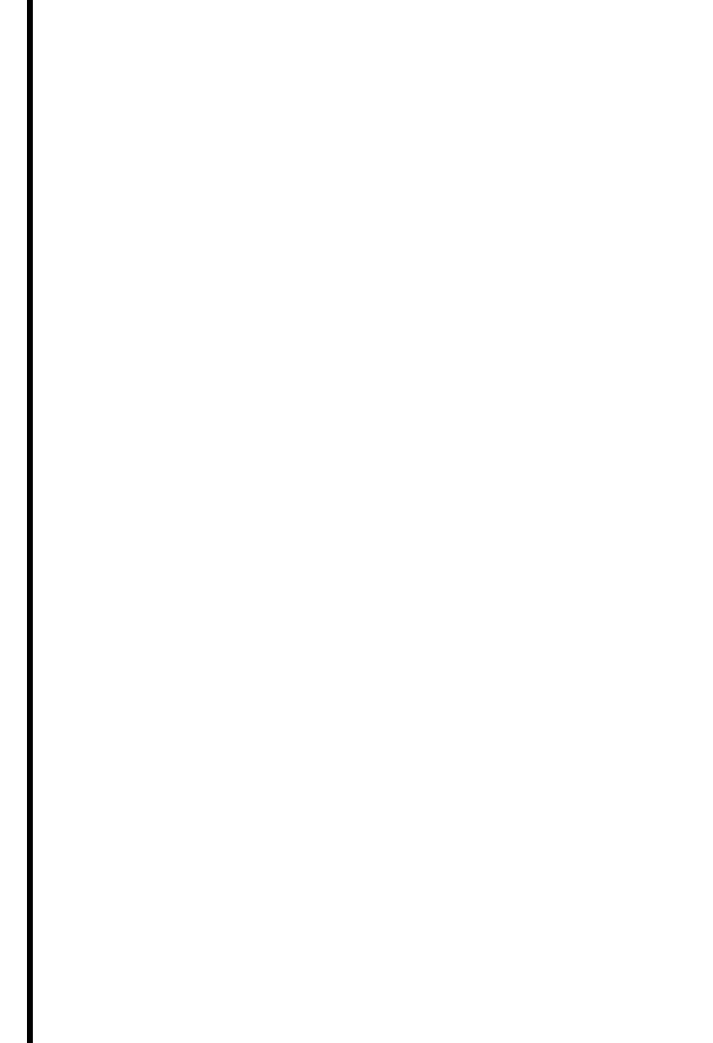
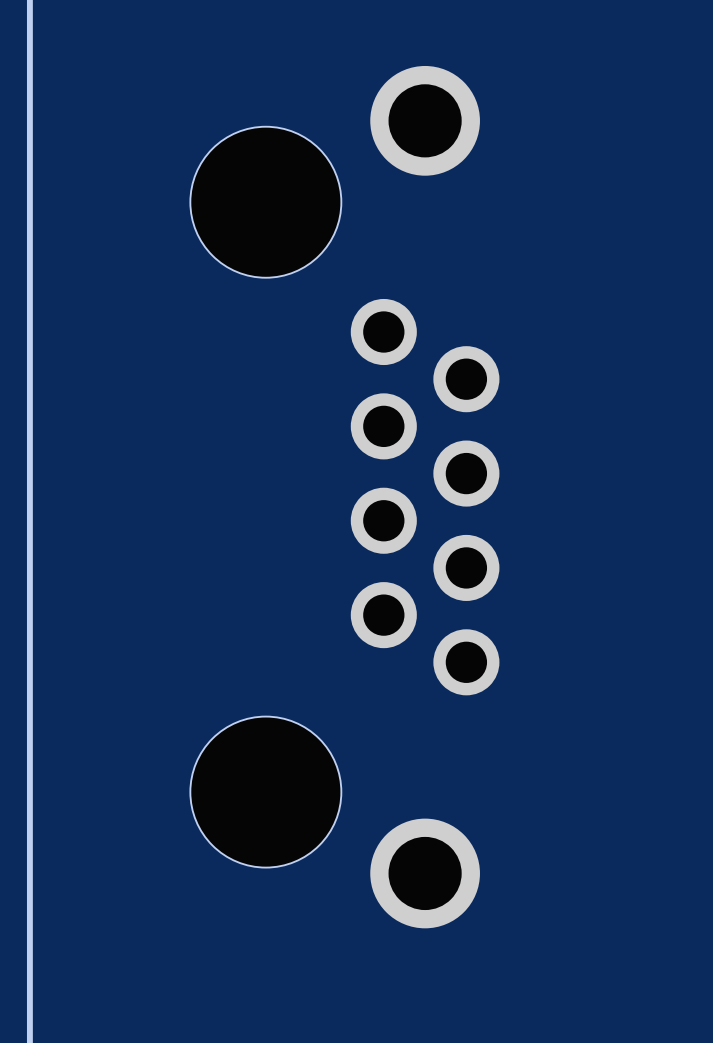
part: none -> (344, 497)

